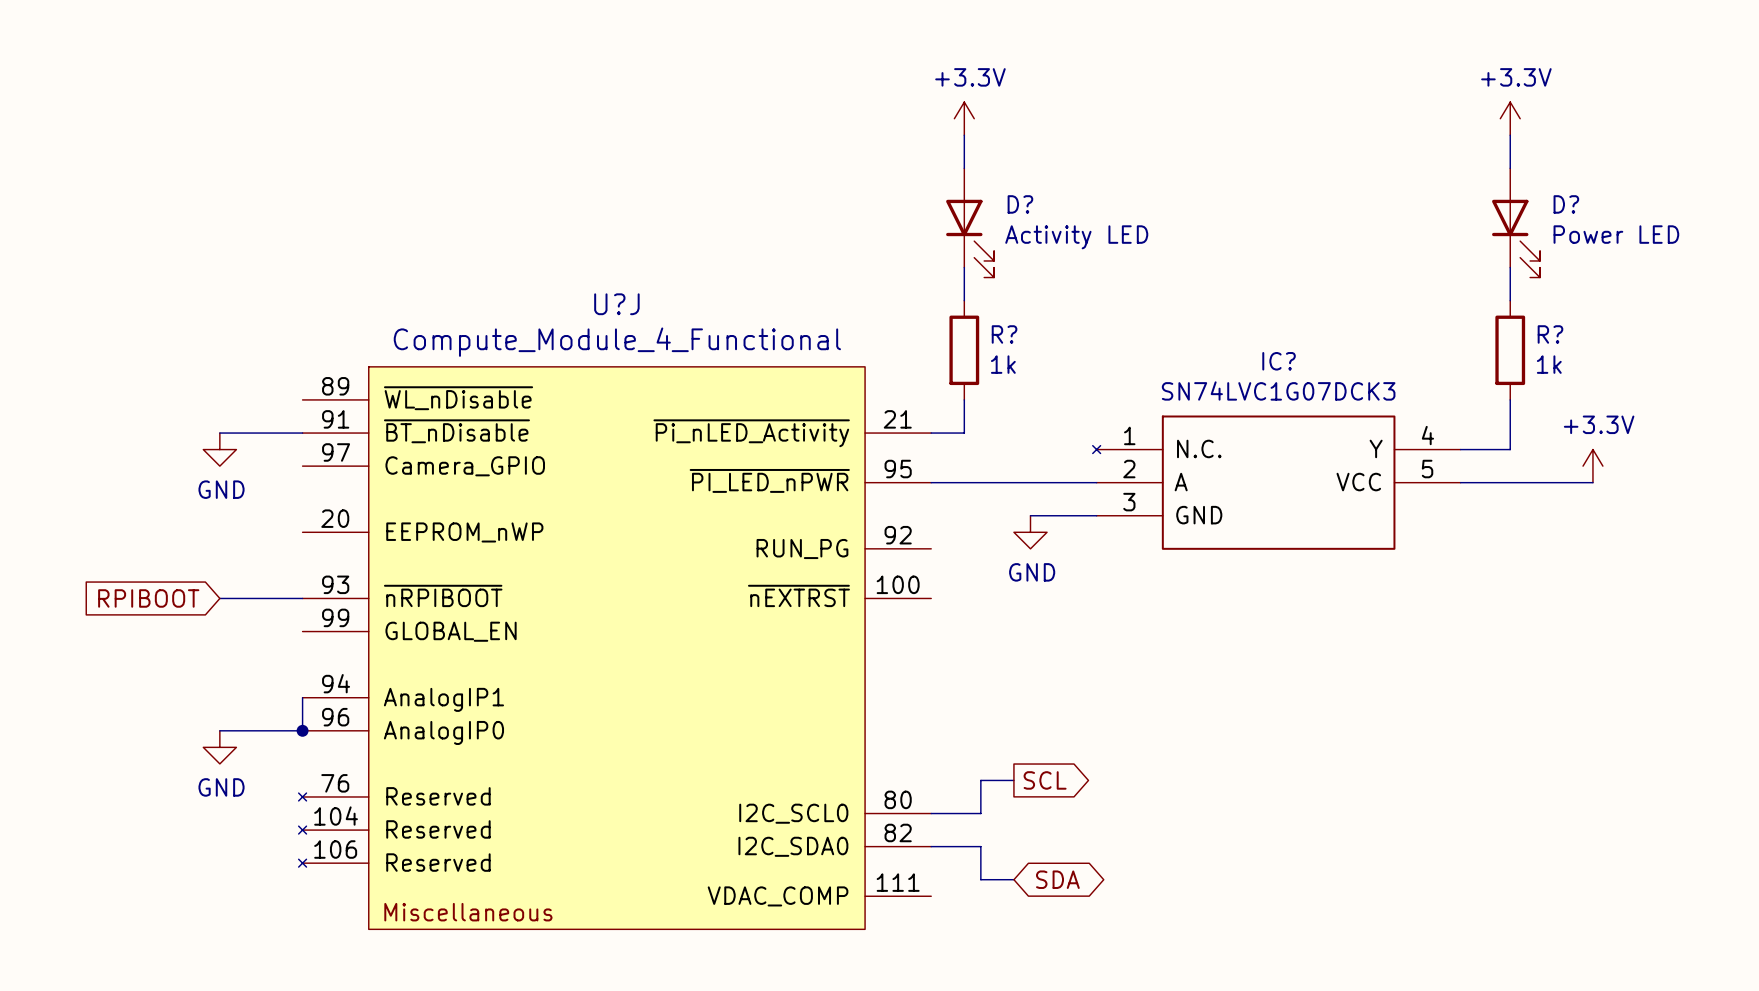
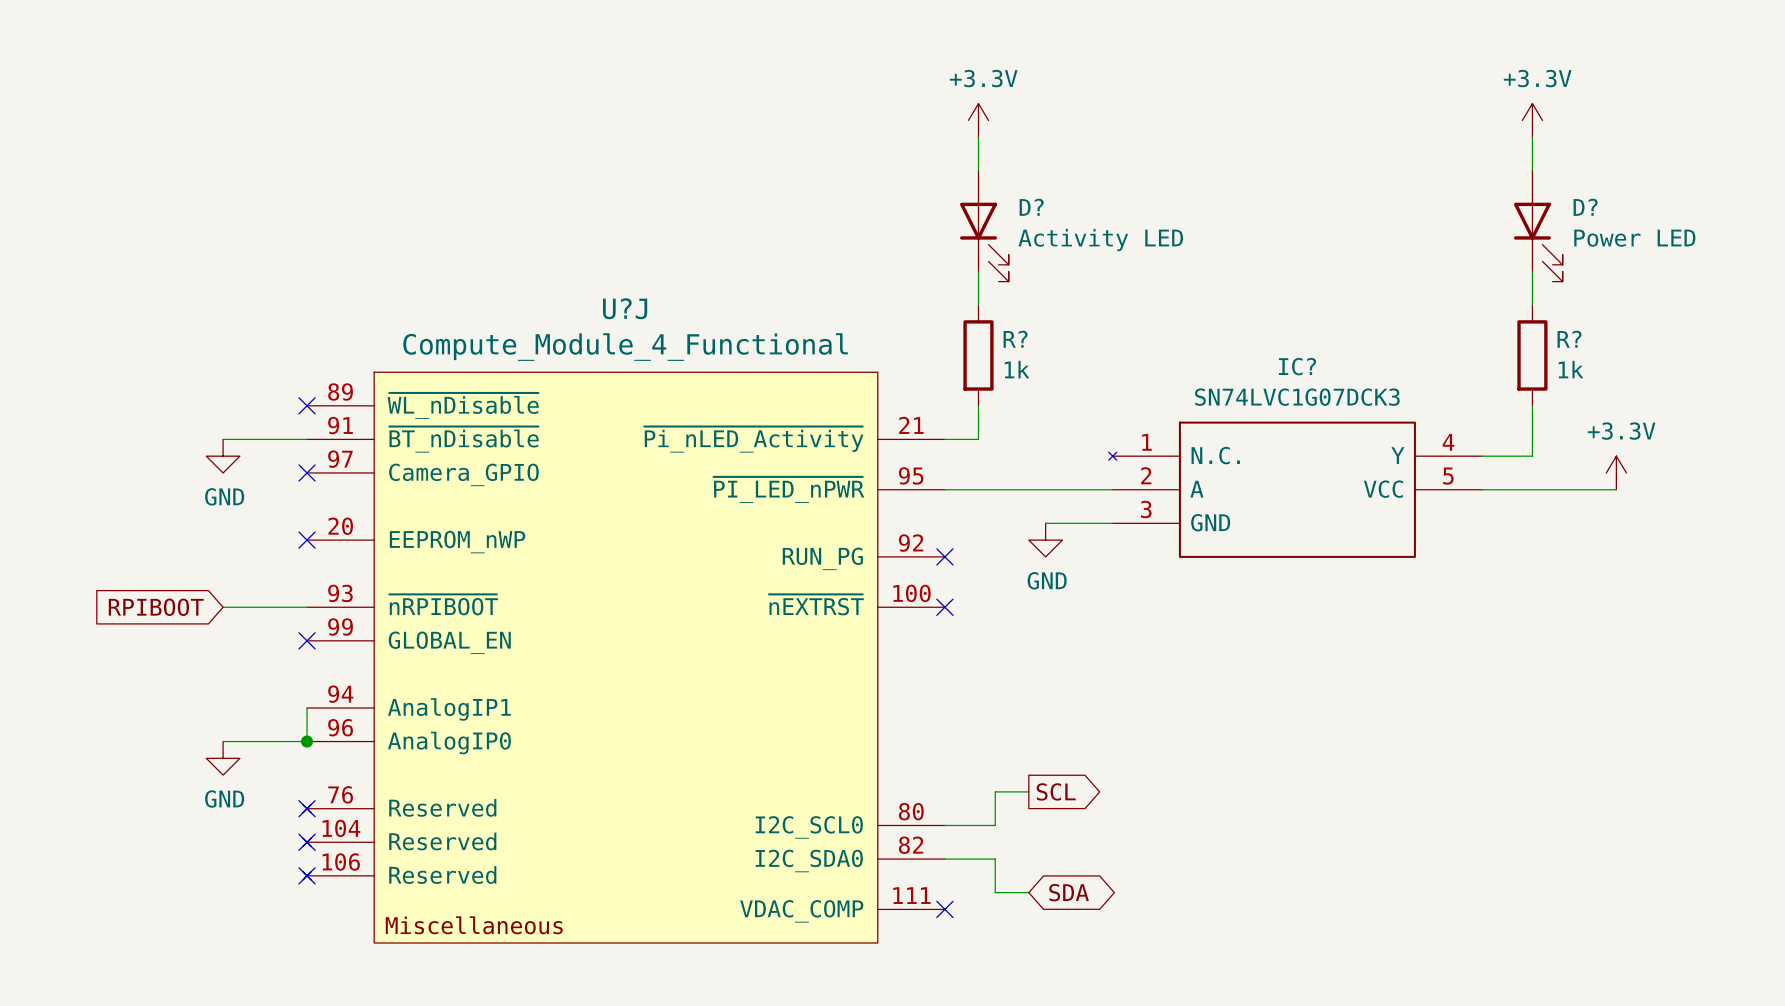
no-connect mark: none -> (307, 405)
no-connect mark: none -> (307, 472)
no-connect mark: none -> (307, 540)
no-connect mark: none -> (944, 556)
no-connect mark: none -> (944, 607)
no-connect mark: none -> (307, 640)
no-connect mark: none -> (307, 808)
no-connect mark: none -> (307, 842)
no-connect mark: none -> (307, 875)
no-connect mark: none -> (944, 909)

